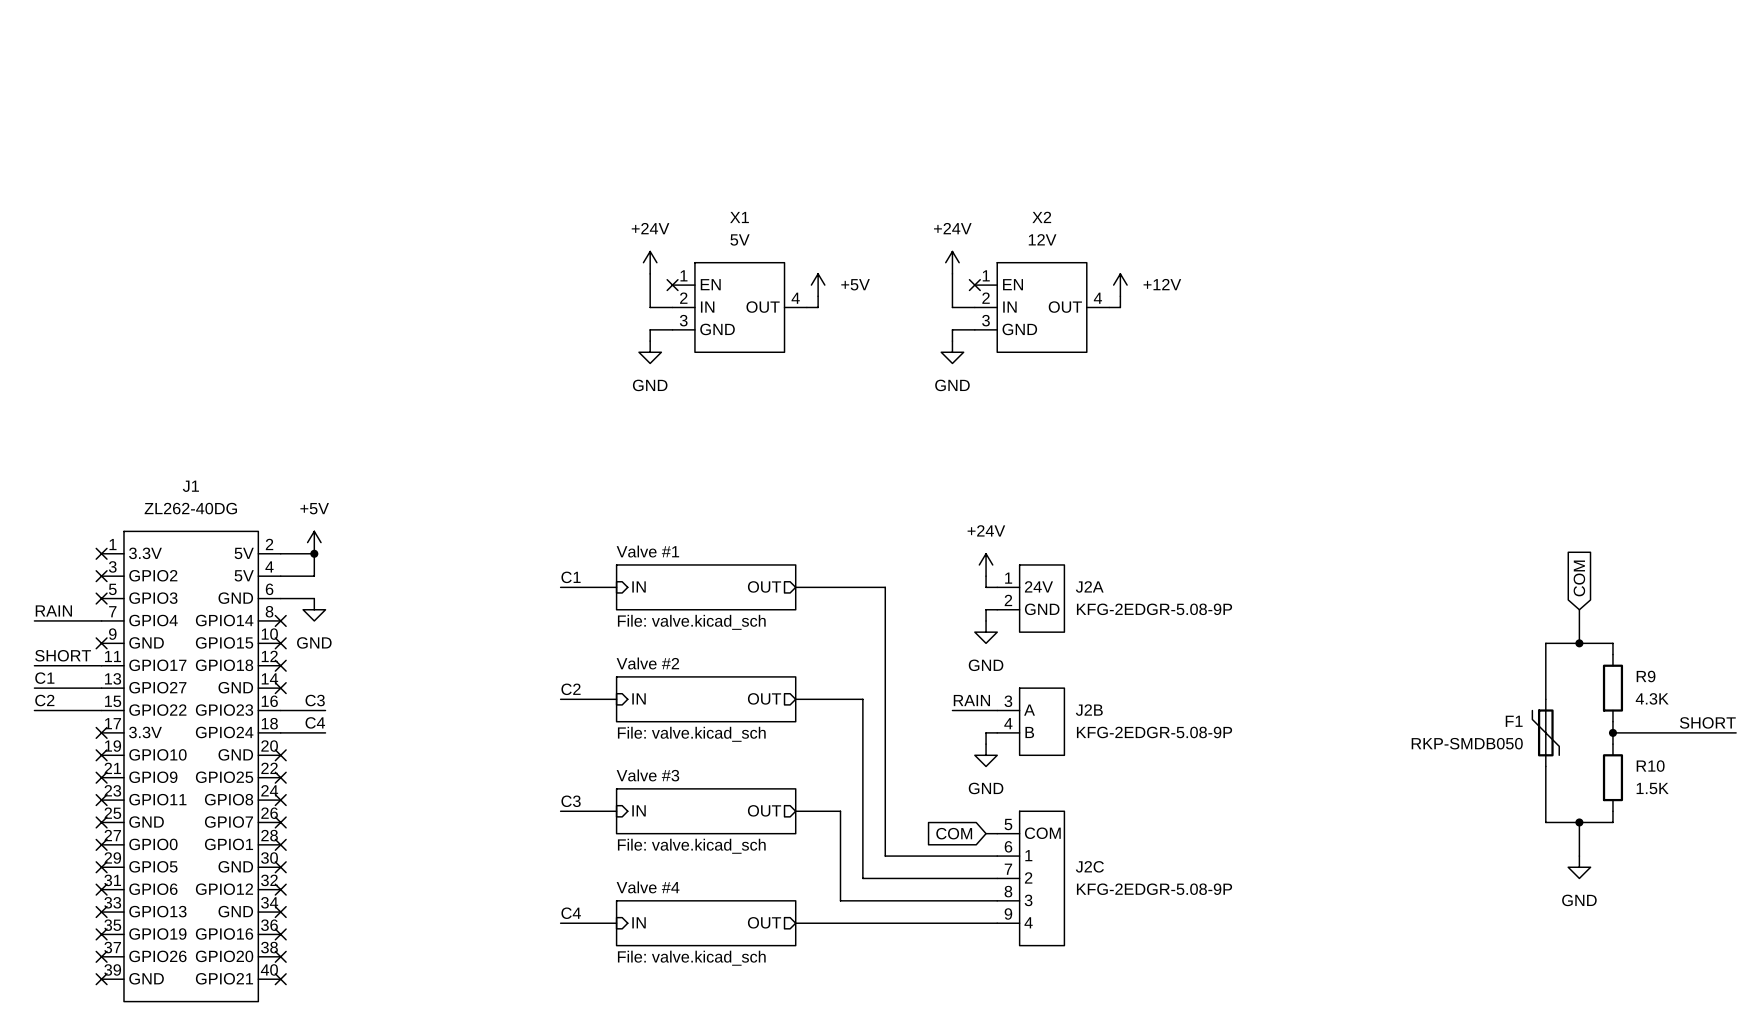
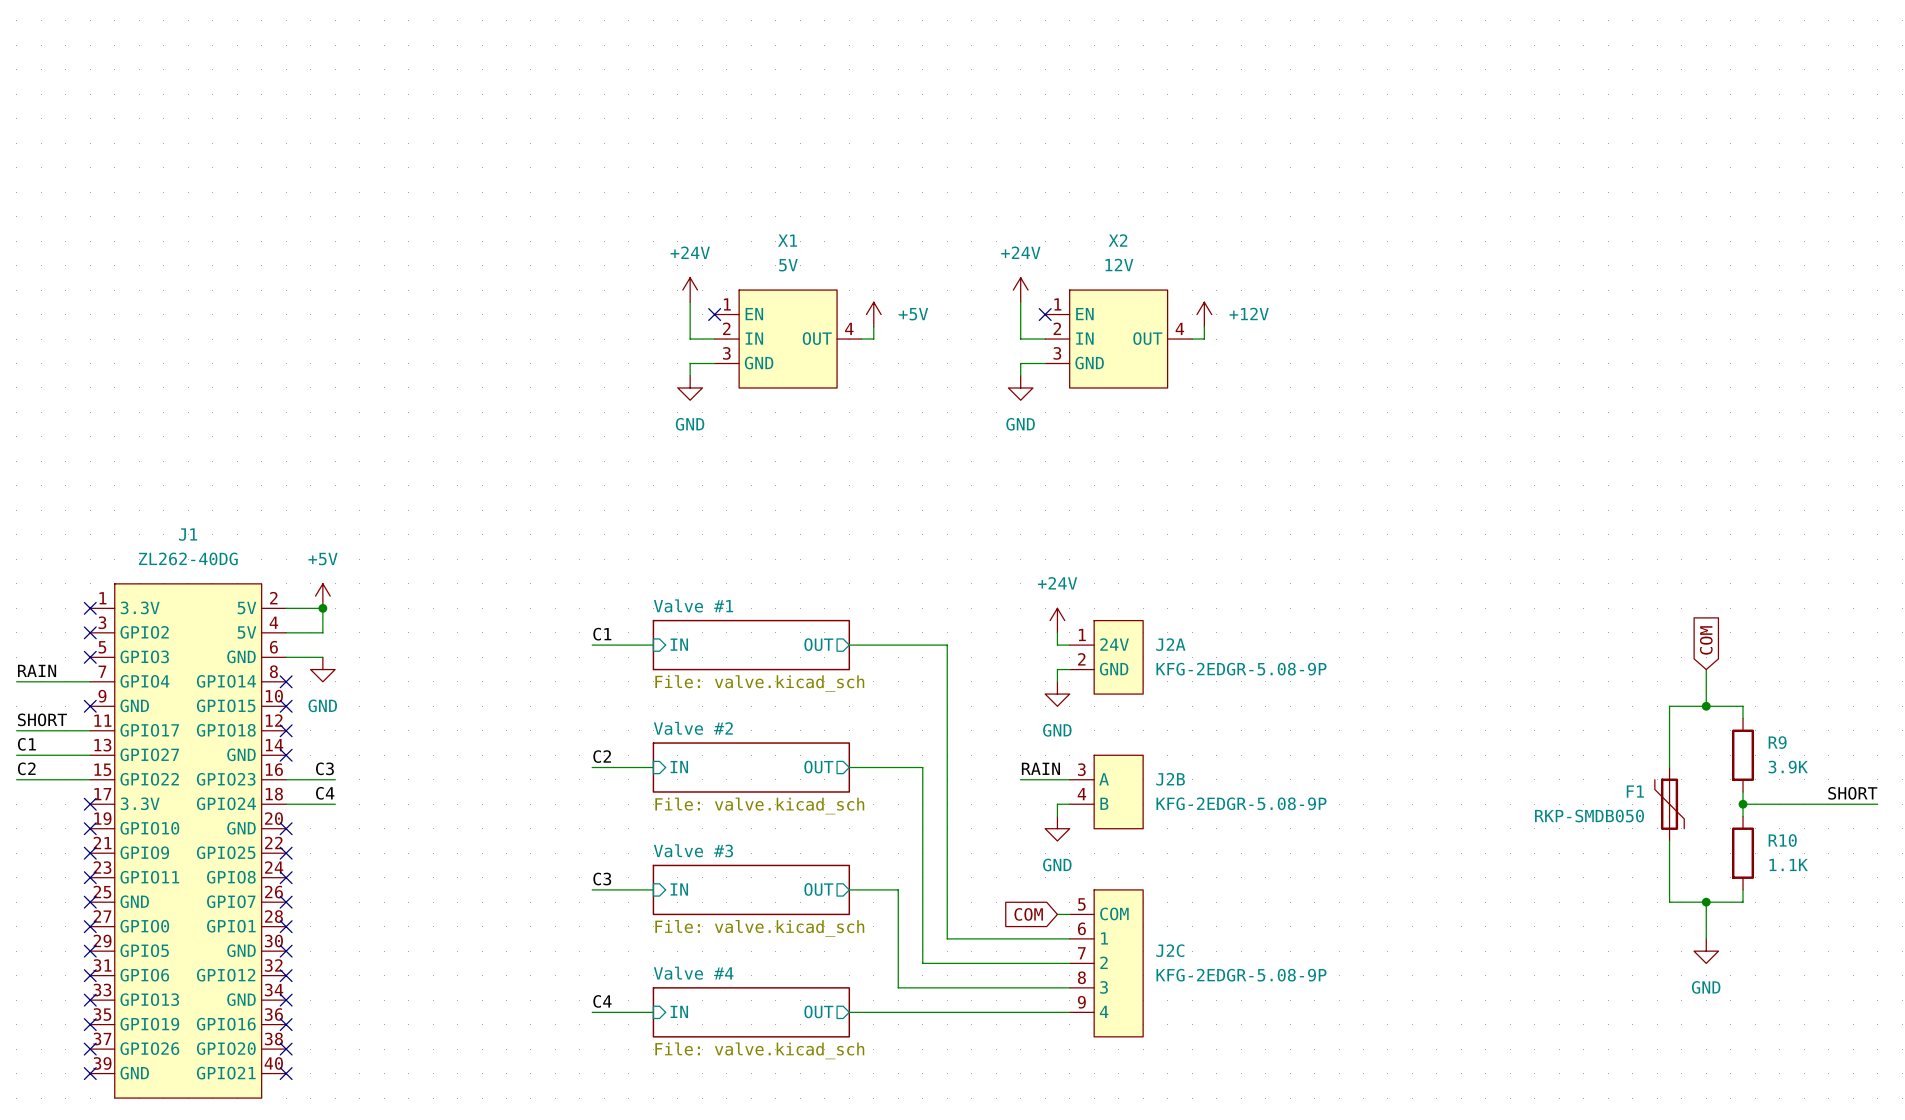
R9 value: 4.3K (1652, 698) -> 3.9K (1788, 767)
R10 value: 1.5K (1652, 788) -> 1.1K (1788, 864)

